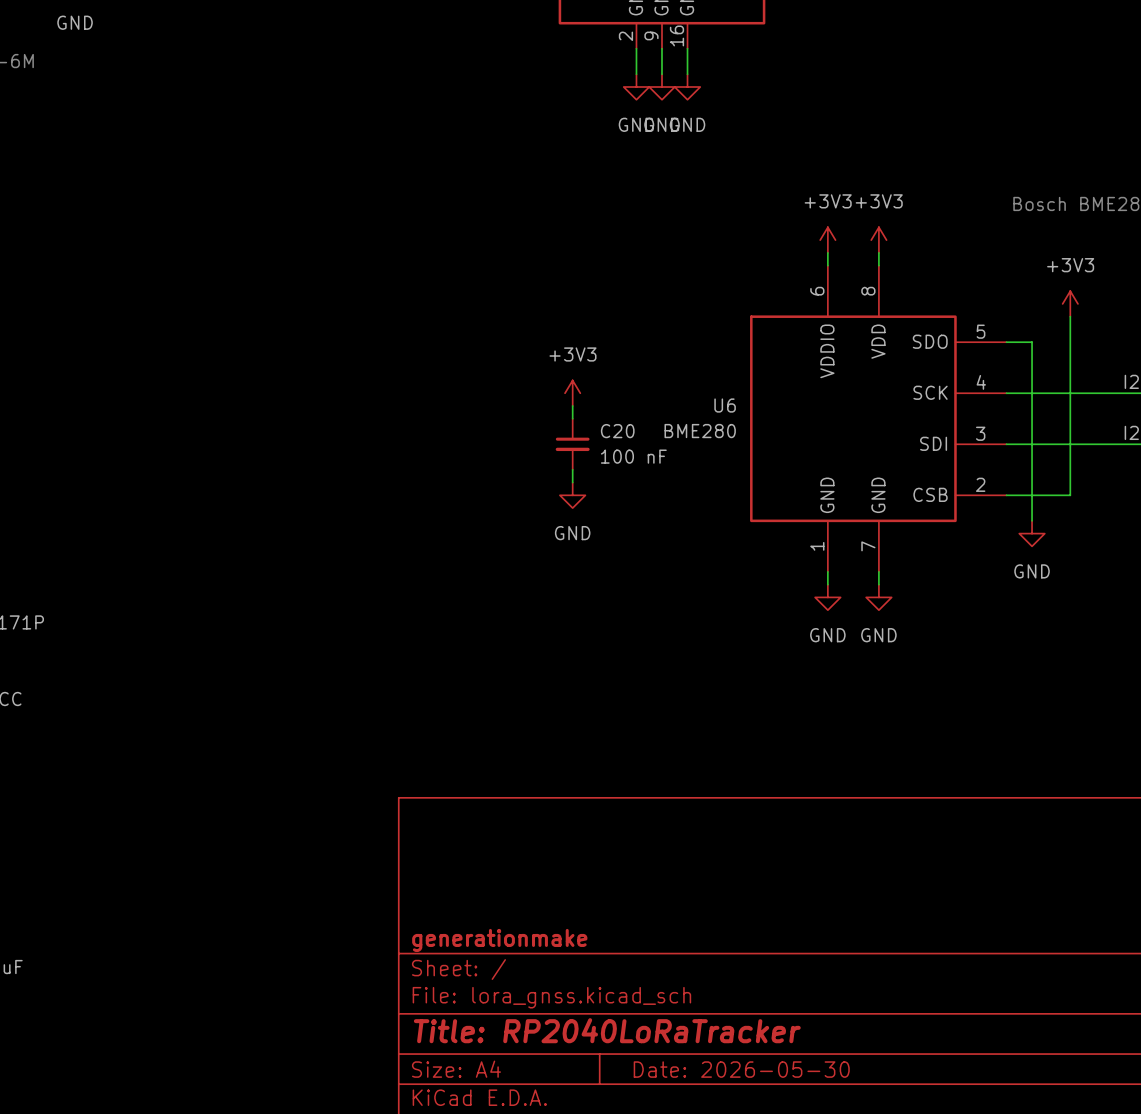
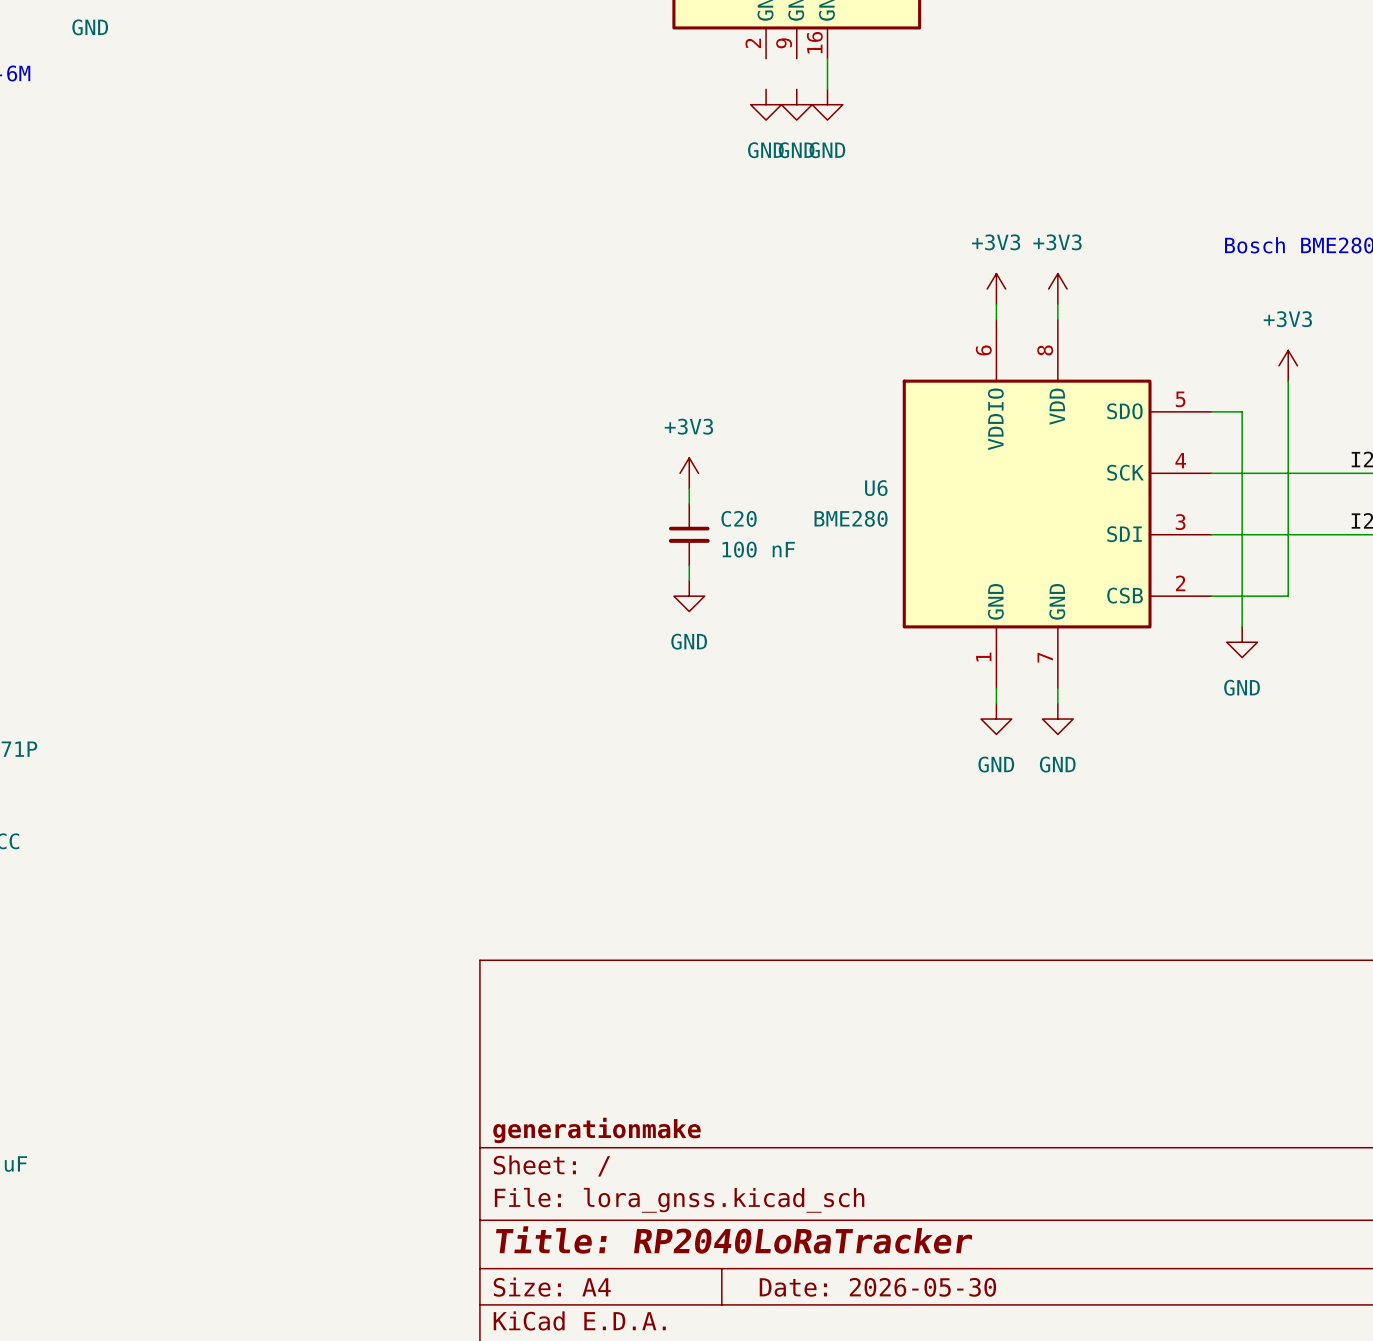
wire: (636, 48) (636, 74) -> none
wire: (661, 48) (661, 74) -> none

